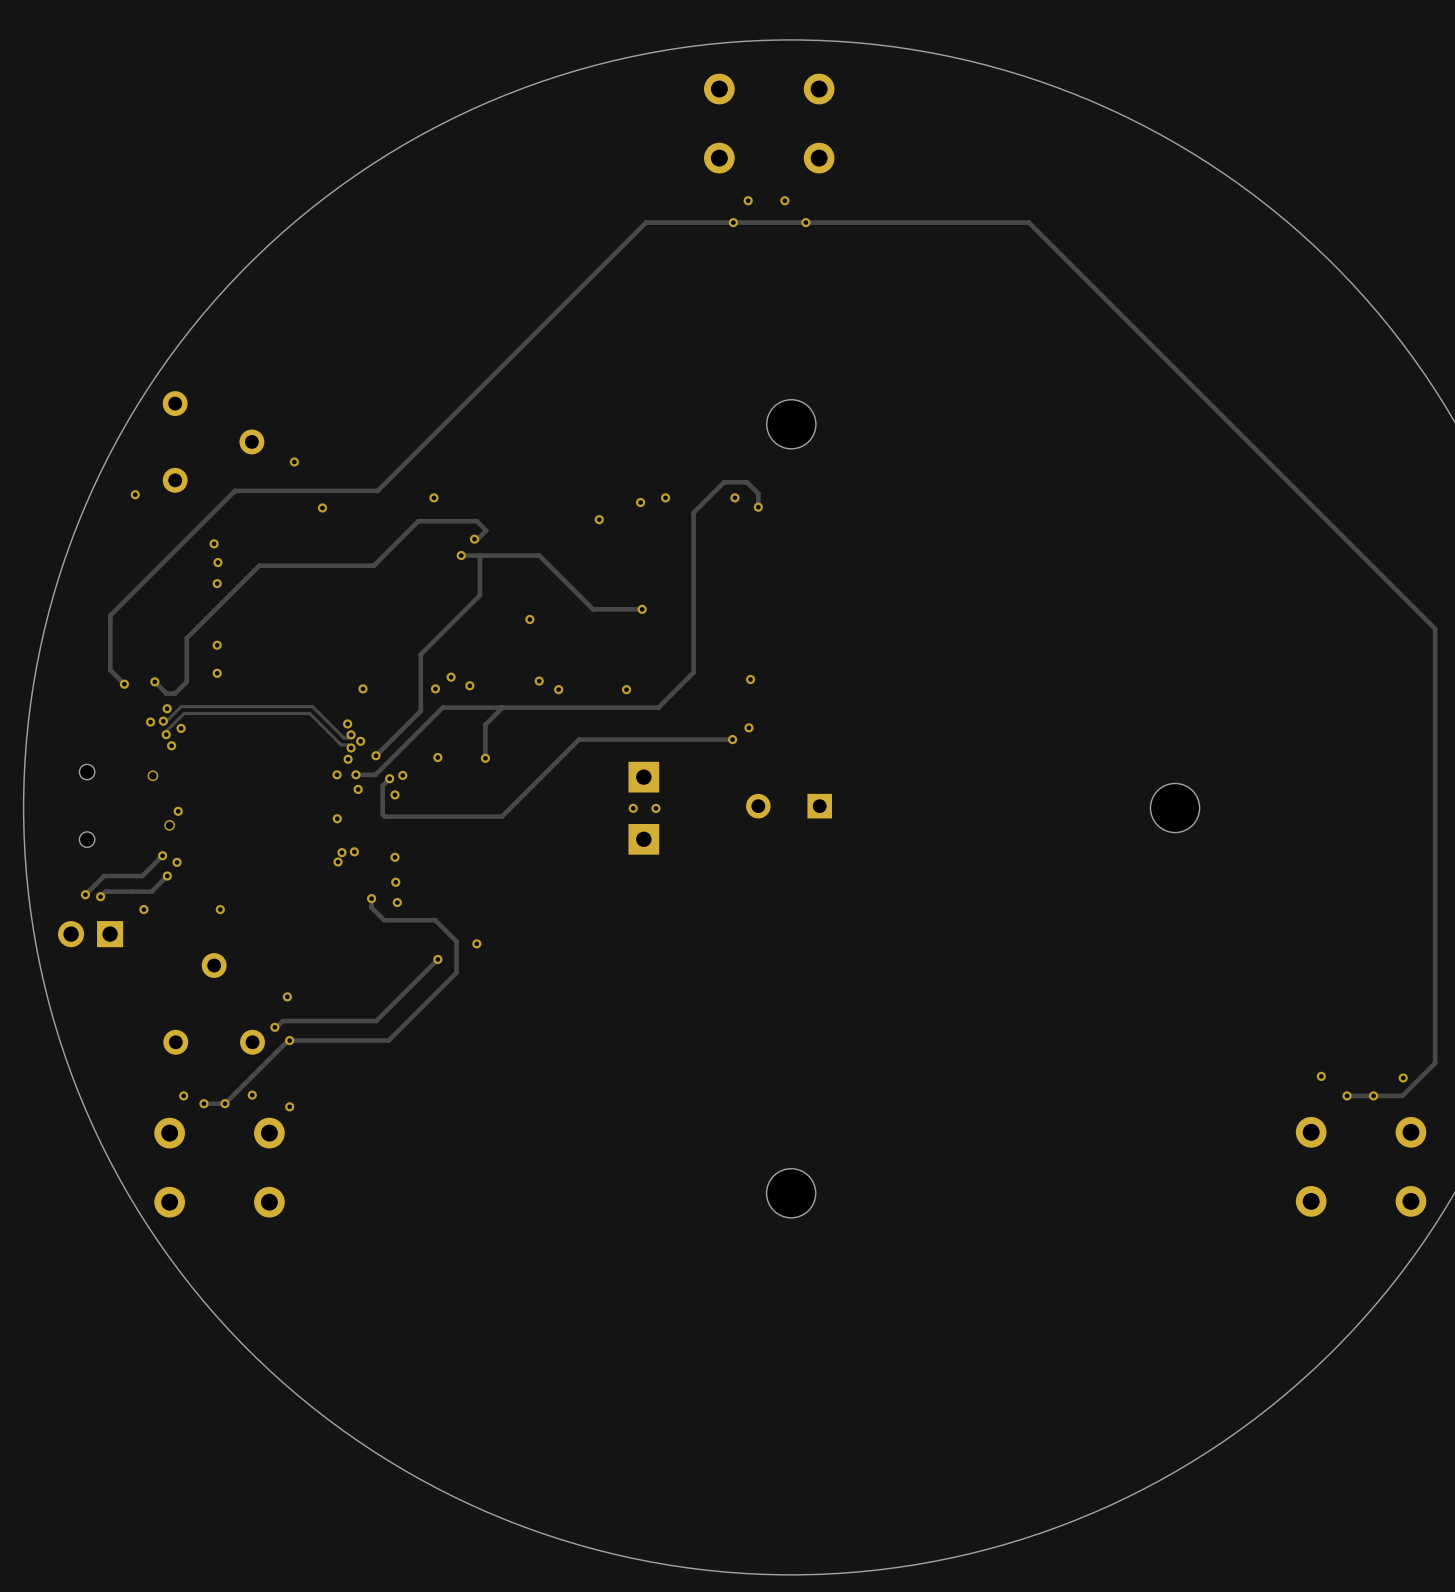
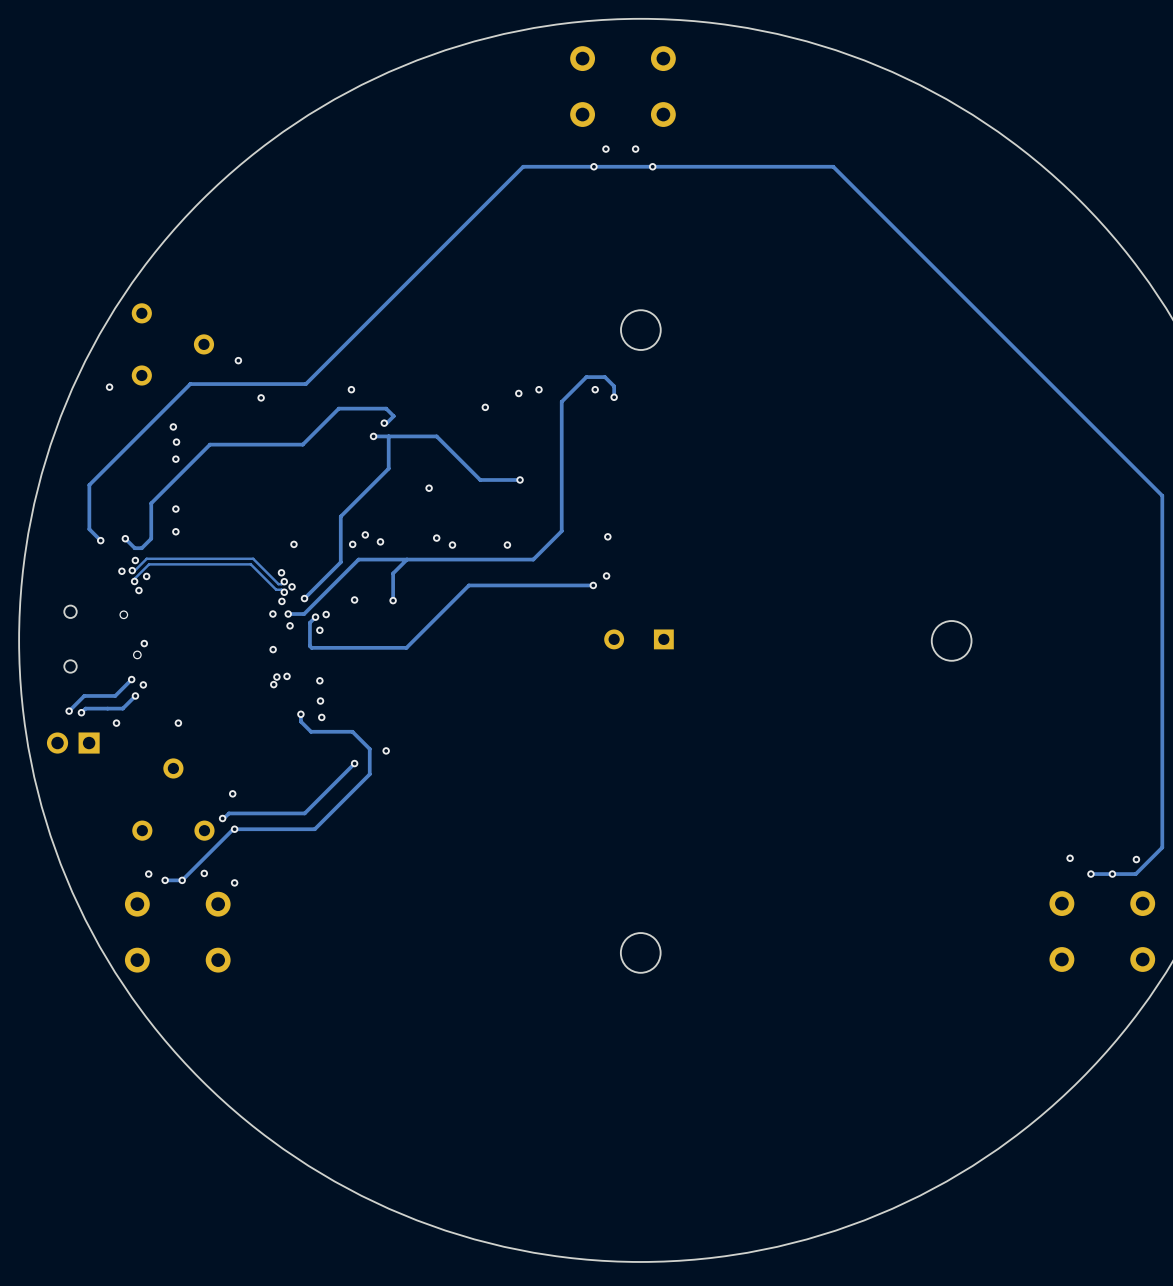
part: (643, 777) -> none
via: (633, 808) -> none
via: (655, 808) -> none
part: (643, 839) -> none

